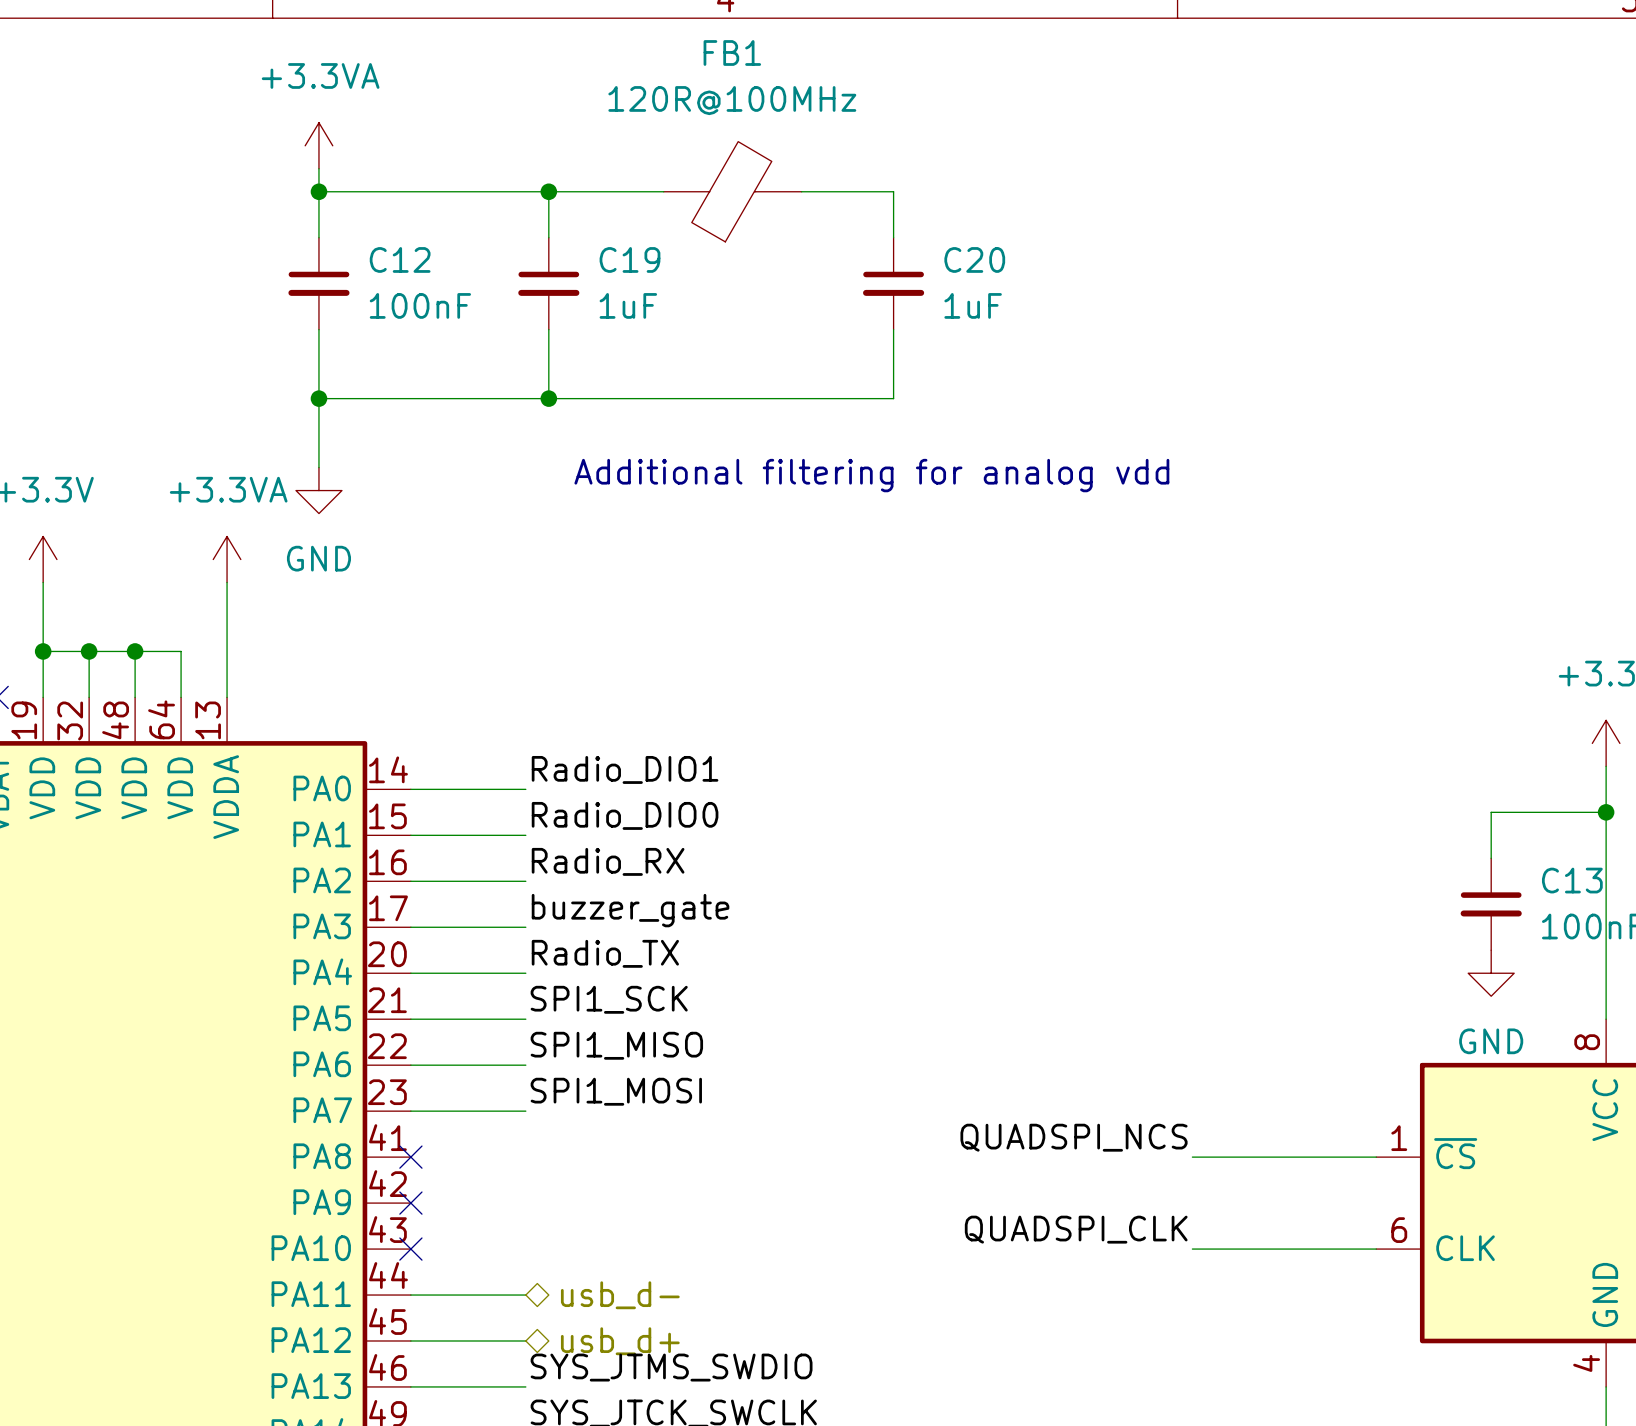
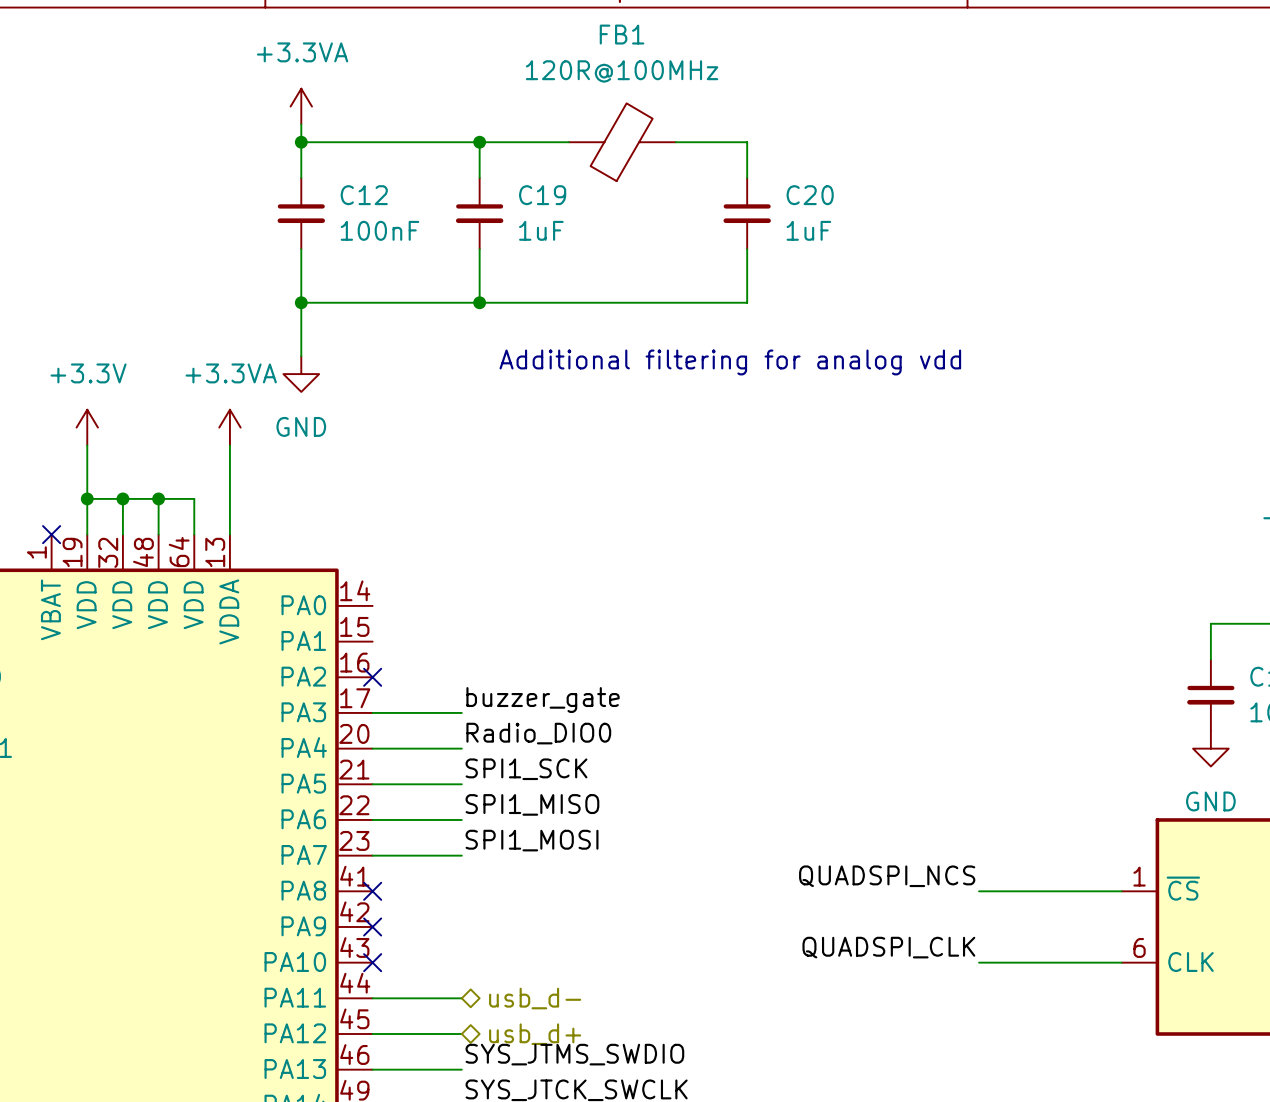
label: Radio_DIO1 (625, 769) -> none
wire: (410, 789) (525, 789) -> none
label: Radio_DIO0 (625, 815) -> none
wire: (410, 835) (525, 835) -> none
label: Radio_RX (608, 861) -> none
wire: (410, 881) (525, 881) -> none
no-connect mark: none -> (372, 677)
label: Radio_TX (605, 953) -> Radio_DIO0 (538, 733)

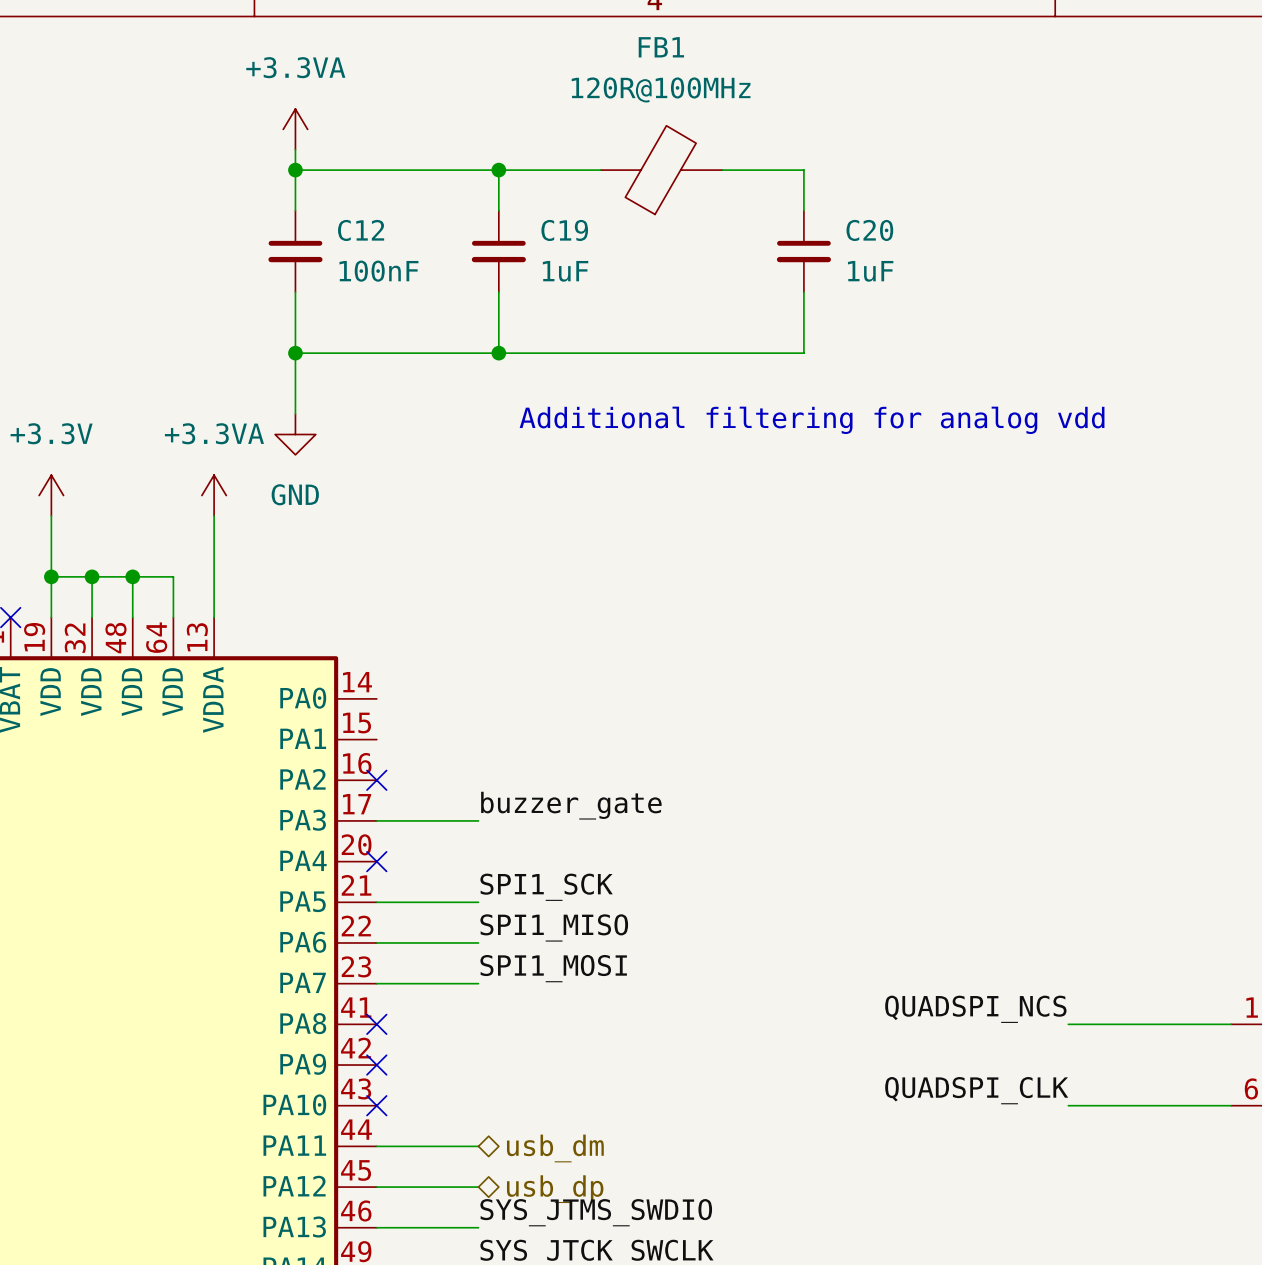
label: Radio_DIO0 (538, 733) -> none
wire: (372, 748) (461, 748) -> none
no-connect mark: none -> (376, 861)
hierarchical label: usb_d- (535, 998) -> usb_dm (555, 1148)
hierarchical label: usb_d+ (535, 1034) -> usb_dp (555, 1189)

